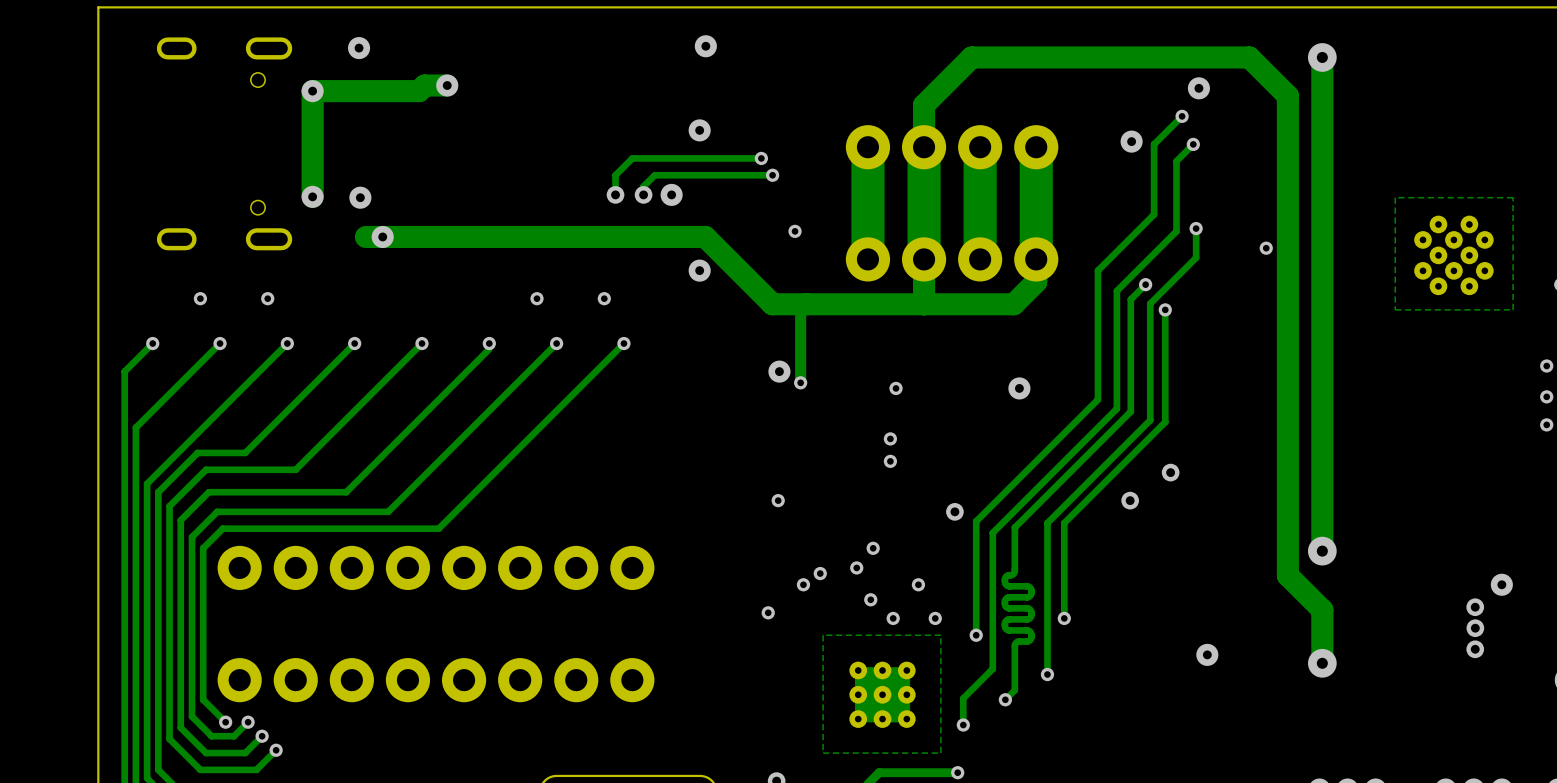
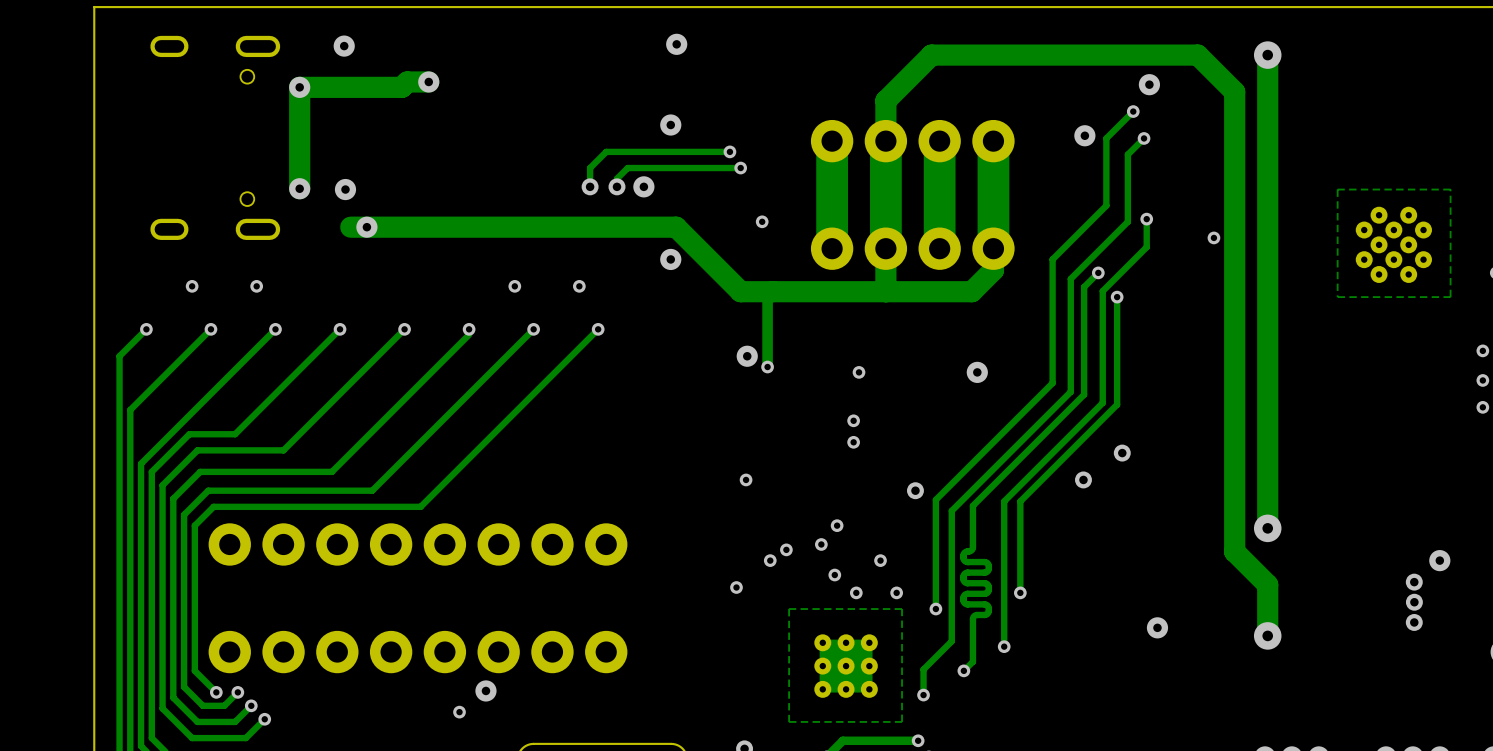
via: none -> (485, 690)
via: none -> (459, 712)

